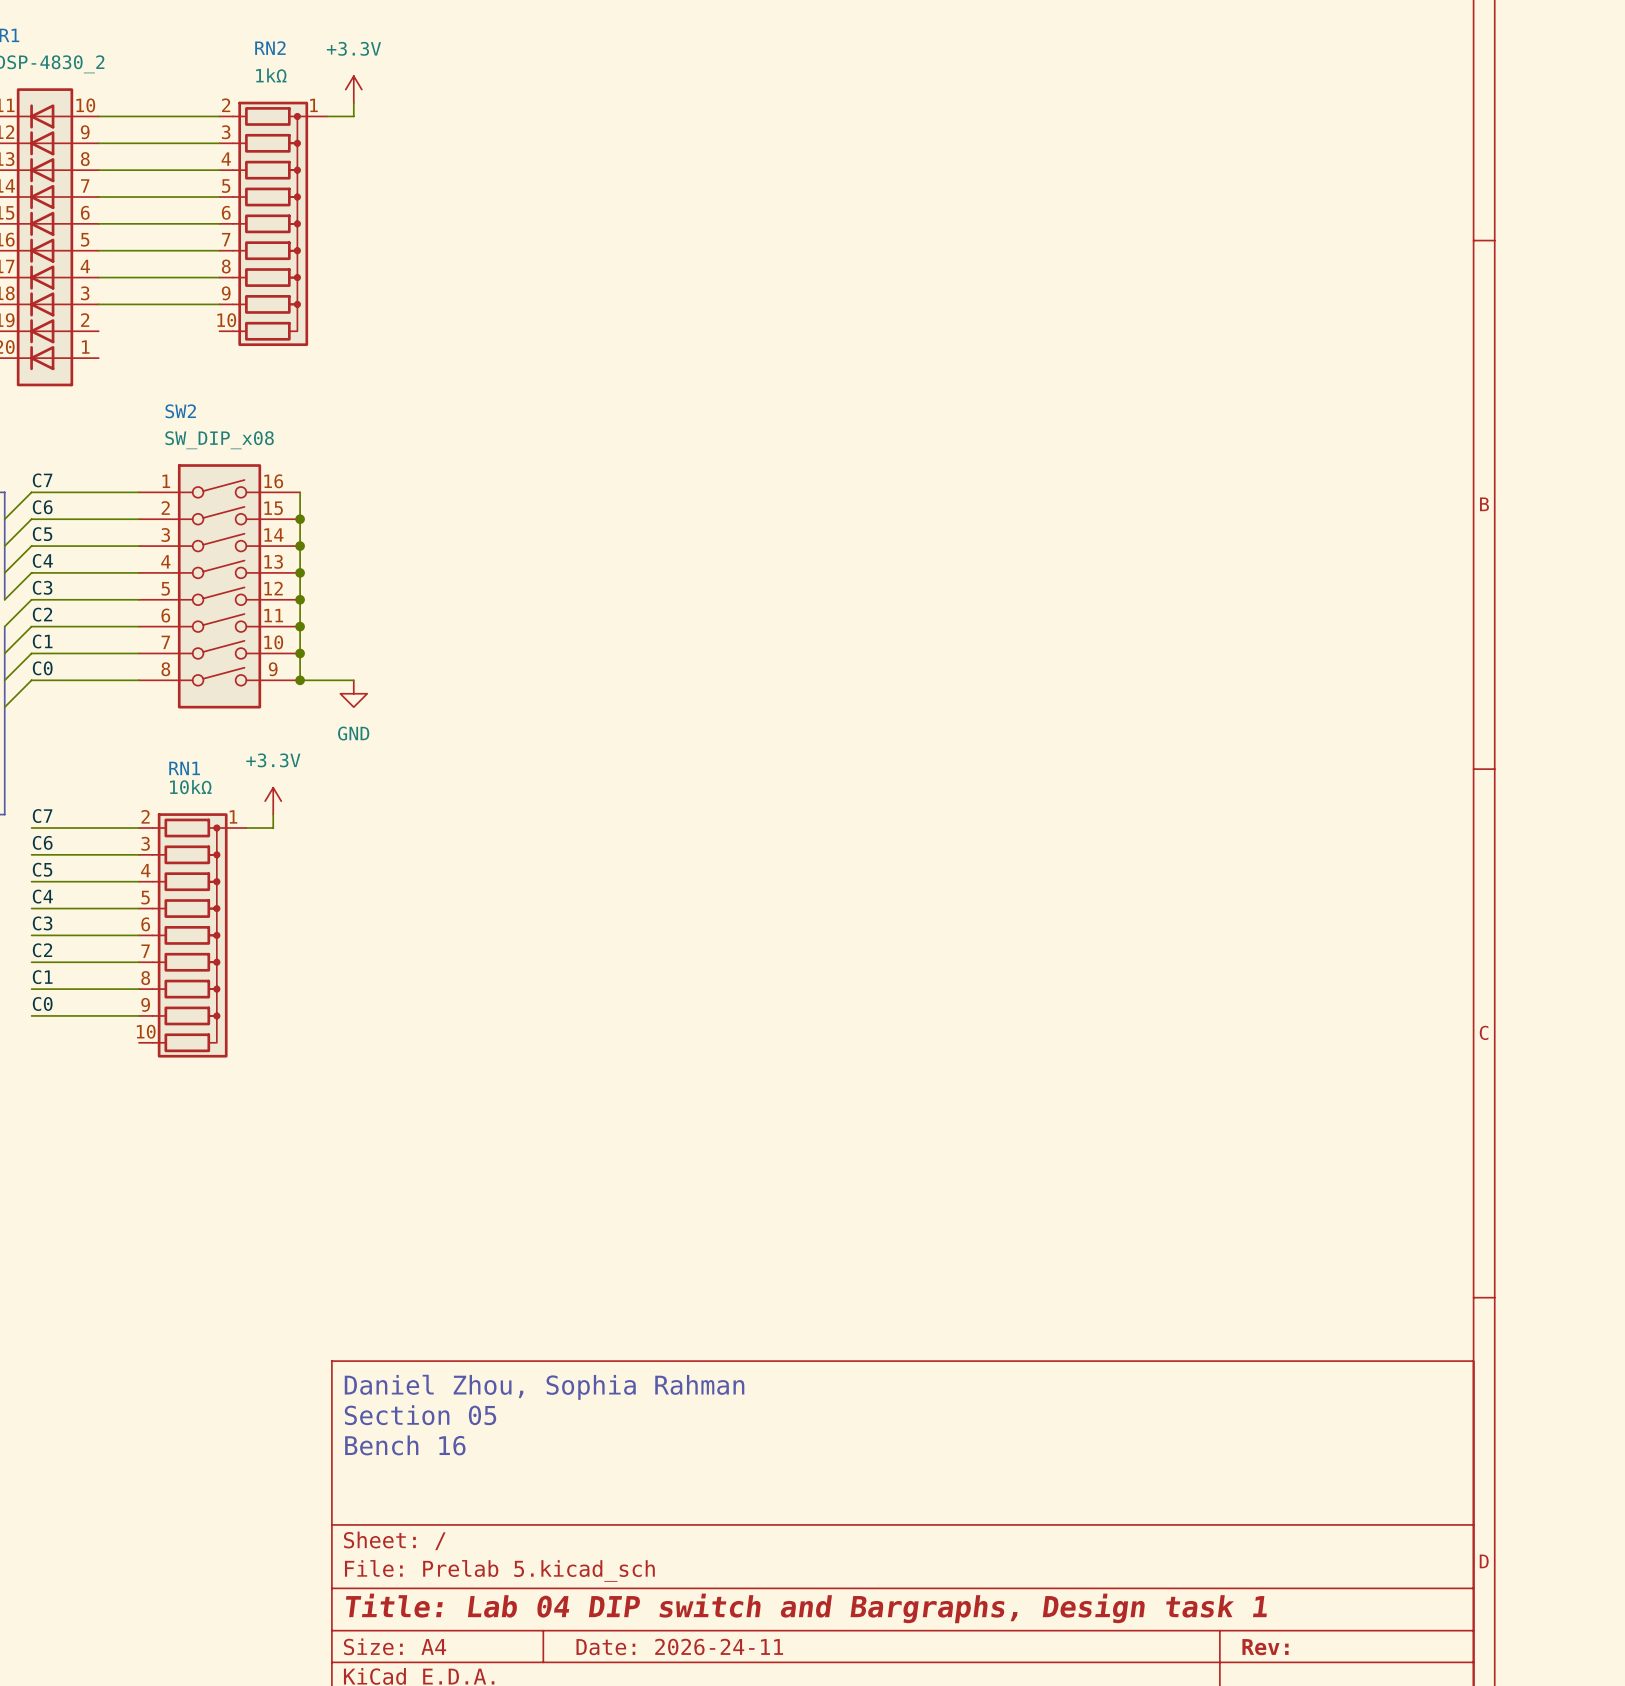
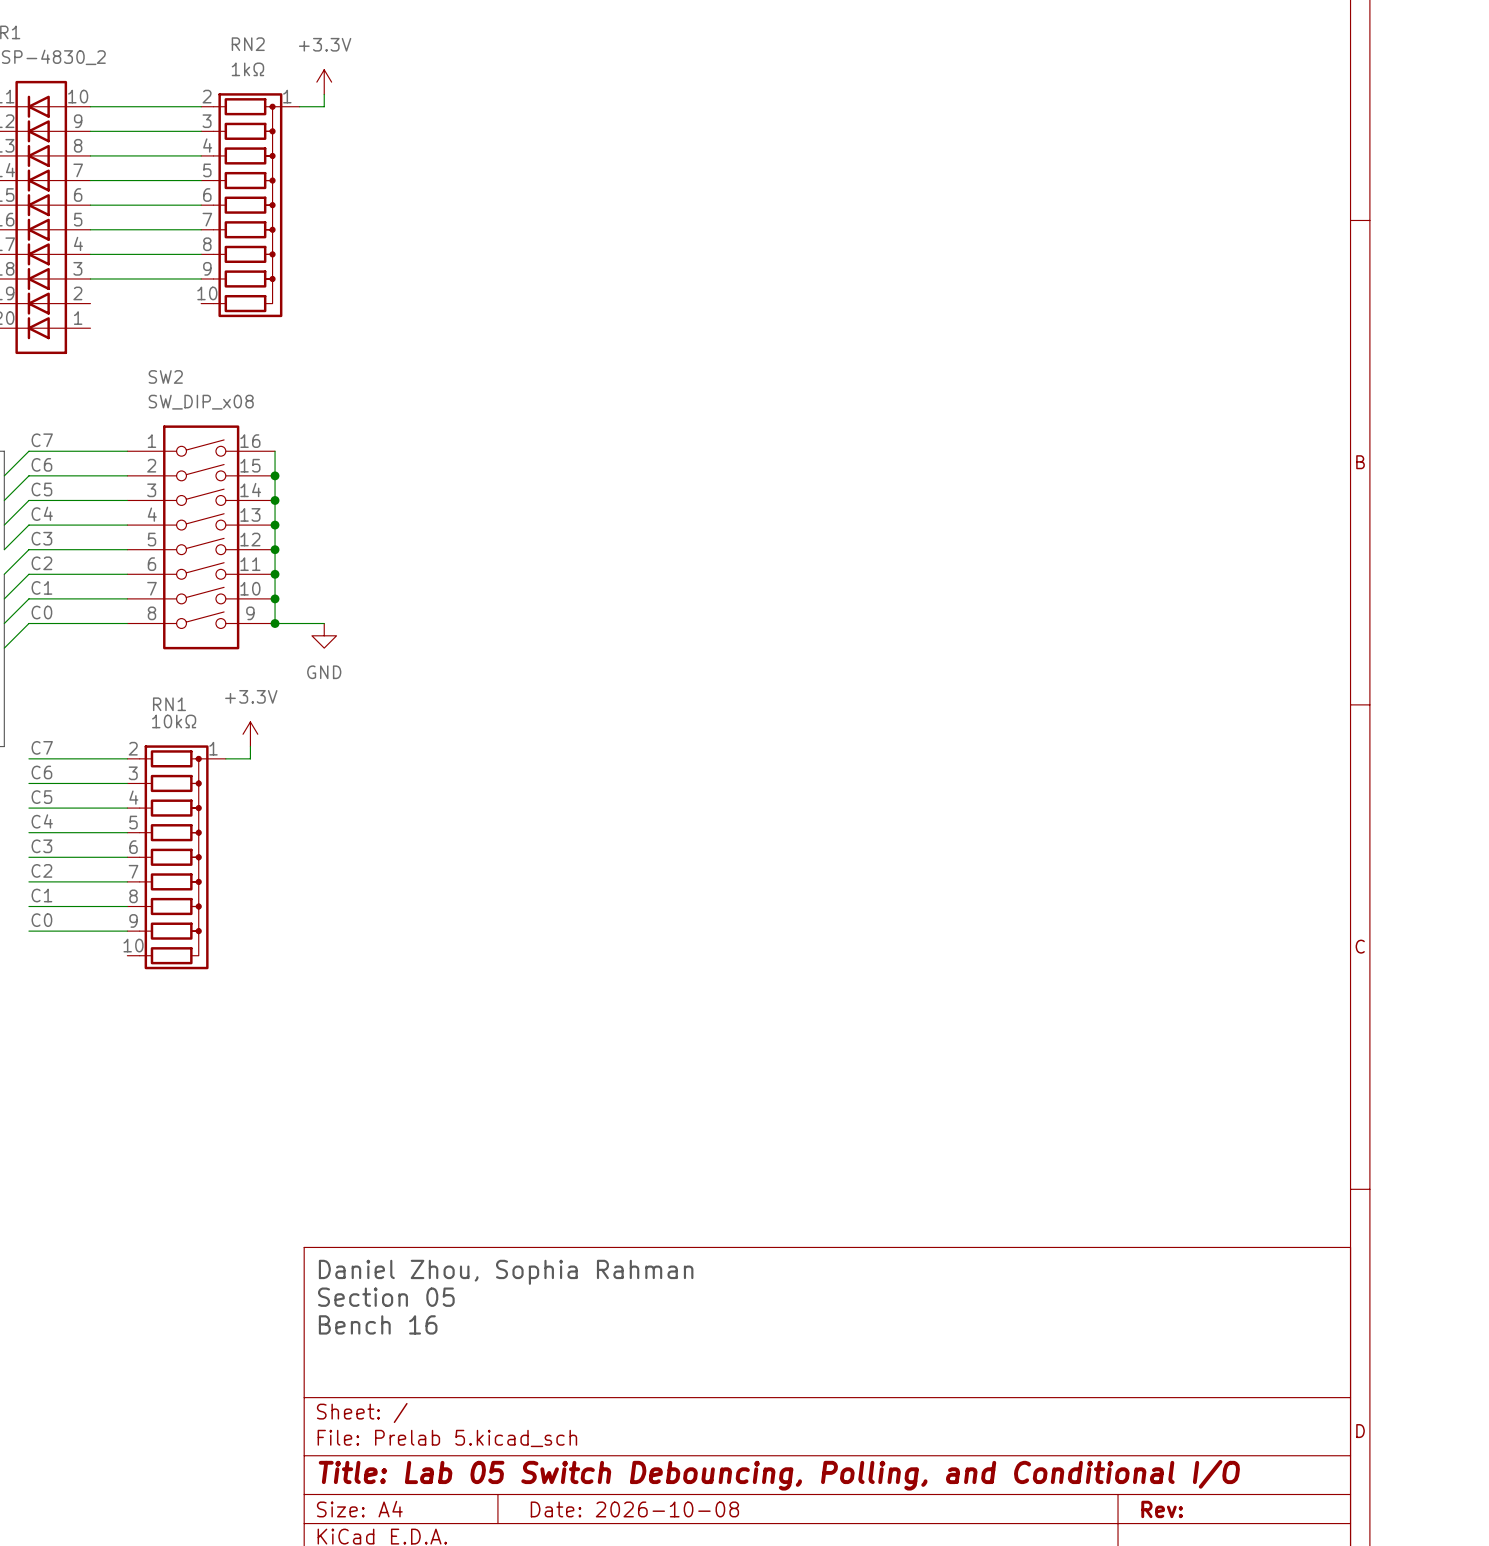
title block: Title: Lab 04 DIP switch and Bargraphs, Design task 1 (806, 1608) -> Title: Lab 05 Switch Debouncing, Polling, and Conditional I/O (779, 1475)
title block: Date: 2026-24-11 (679, 1647) -> Date: 2026-10-08 (634, 1509)

